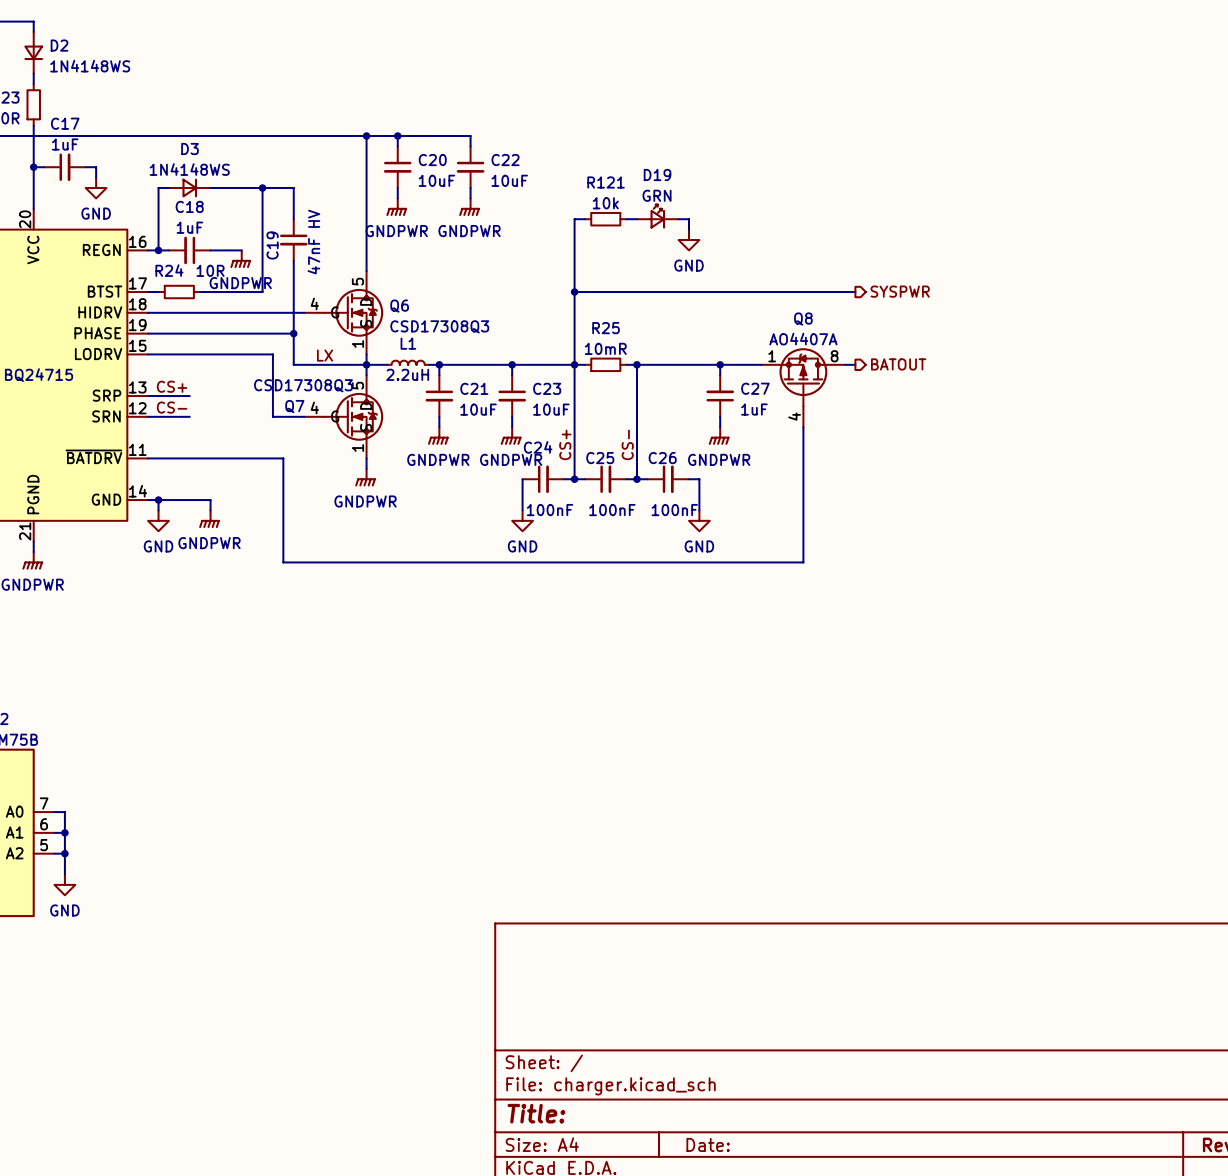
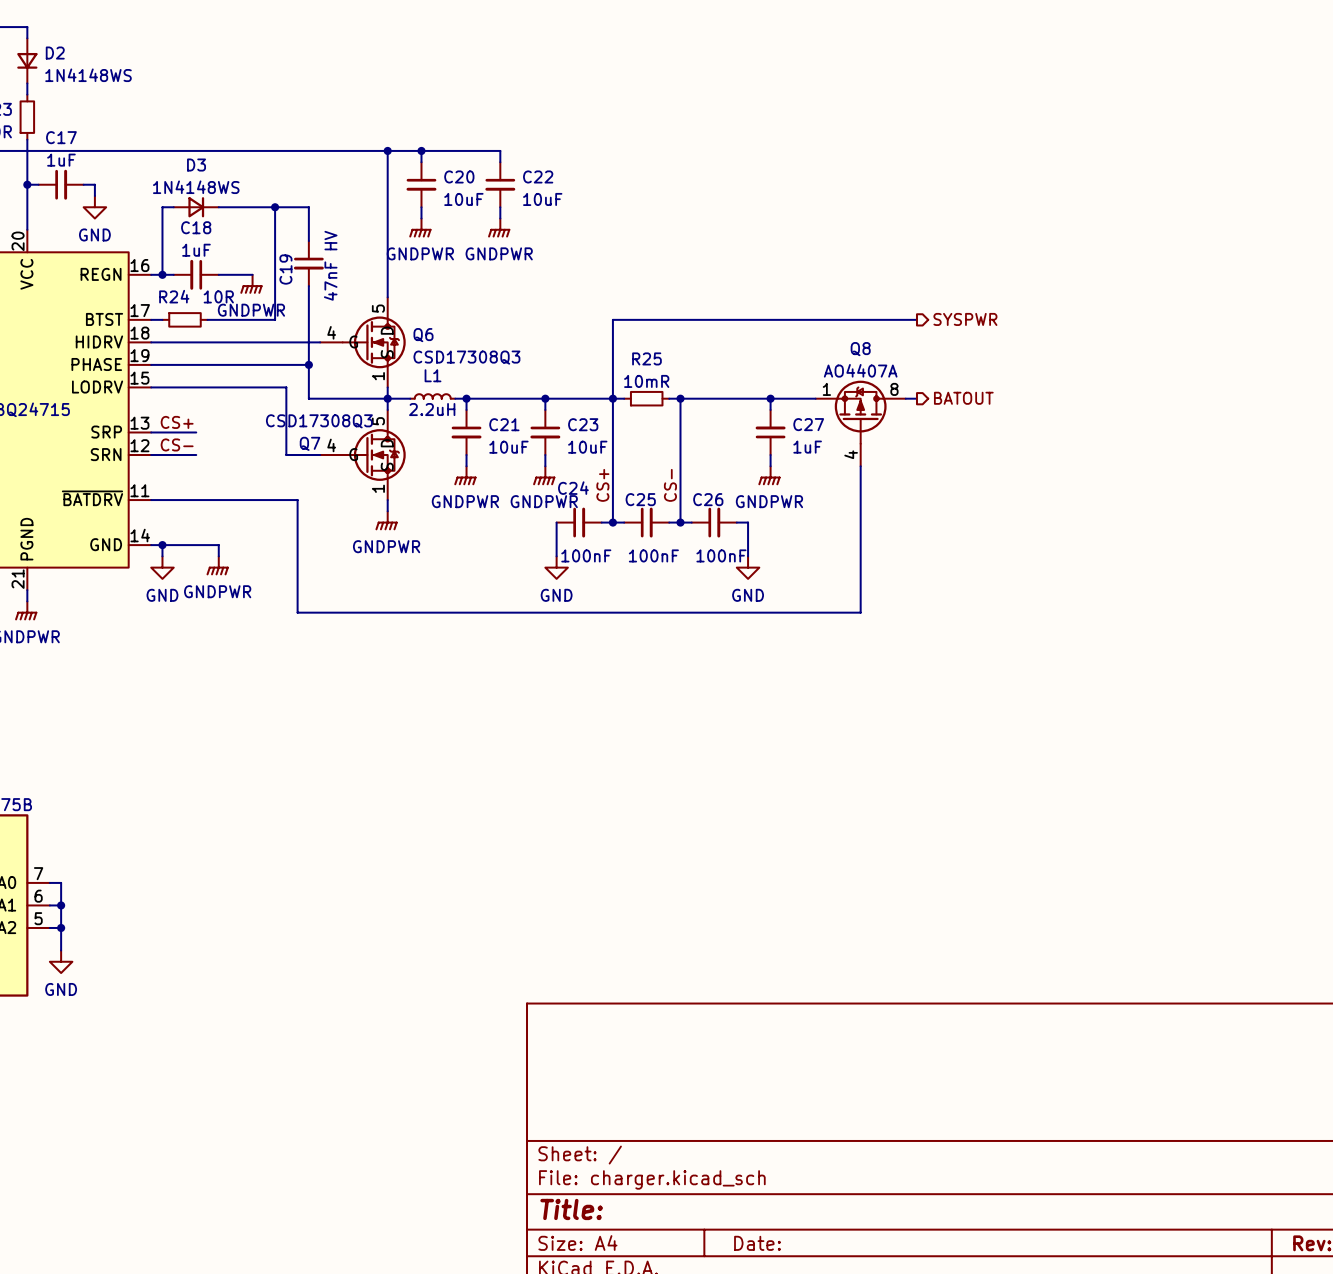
D19: GRN (657, 216) -> none
wire: (584, 219) (574, 219) (574, 292) -> none
R121: 10k (605, 219) -> none
wire: (626, 219) (636, 219) -> none
wire: (678, 219) (688, 219) (688, 229) -> none
power symbol: GND (688, 240) -> none
junction: (574, 292) -> none
label: LX (325, 355) -> none

